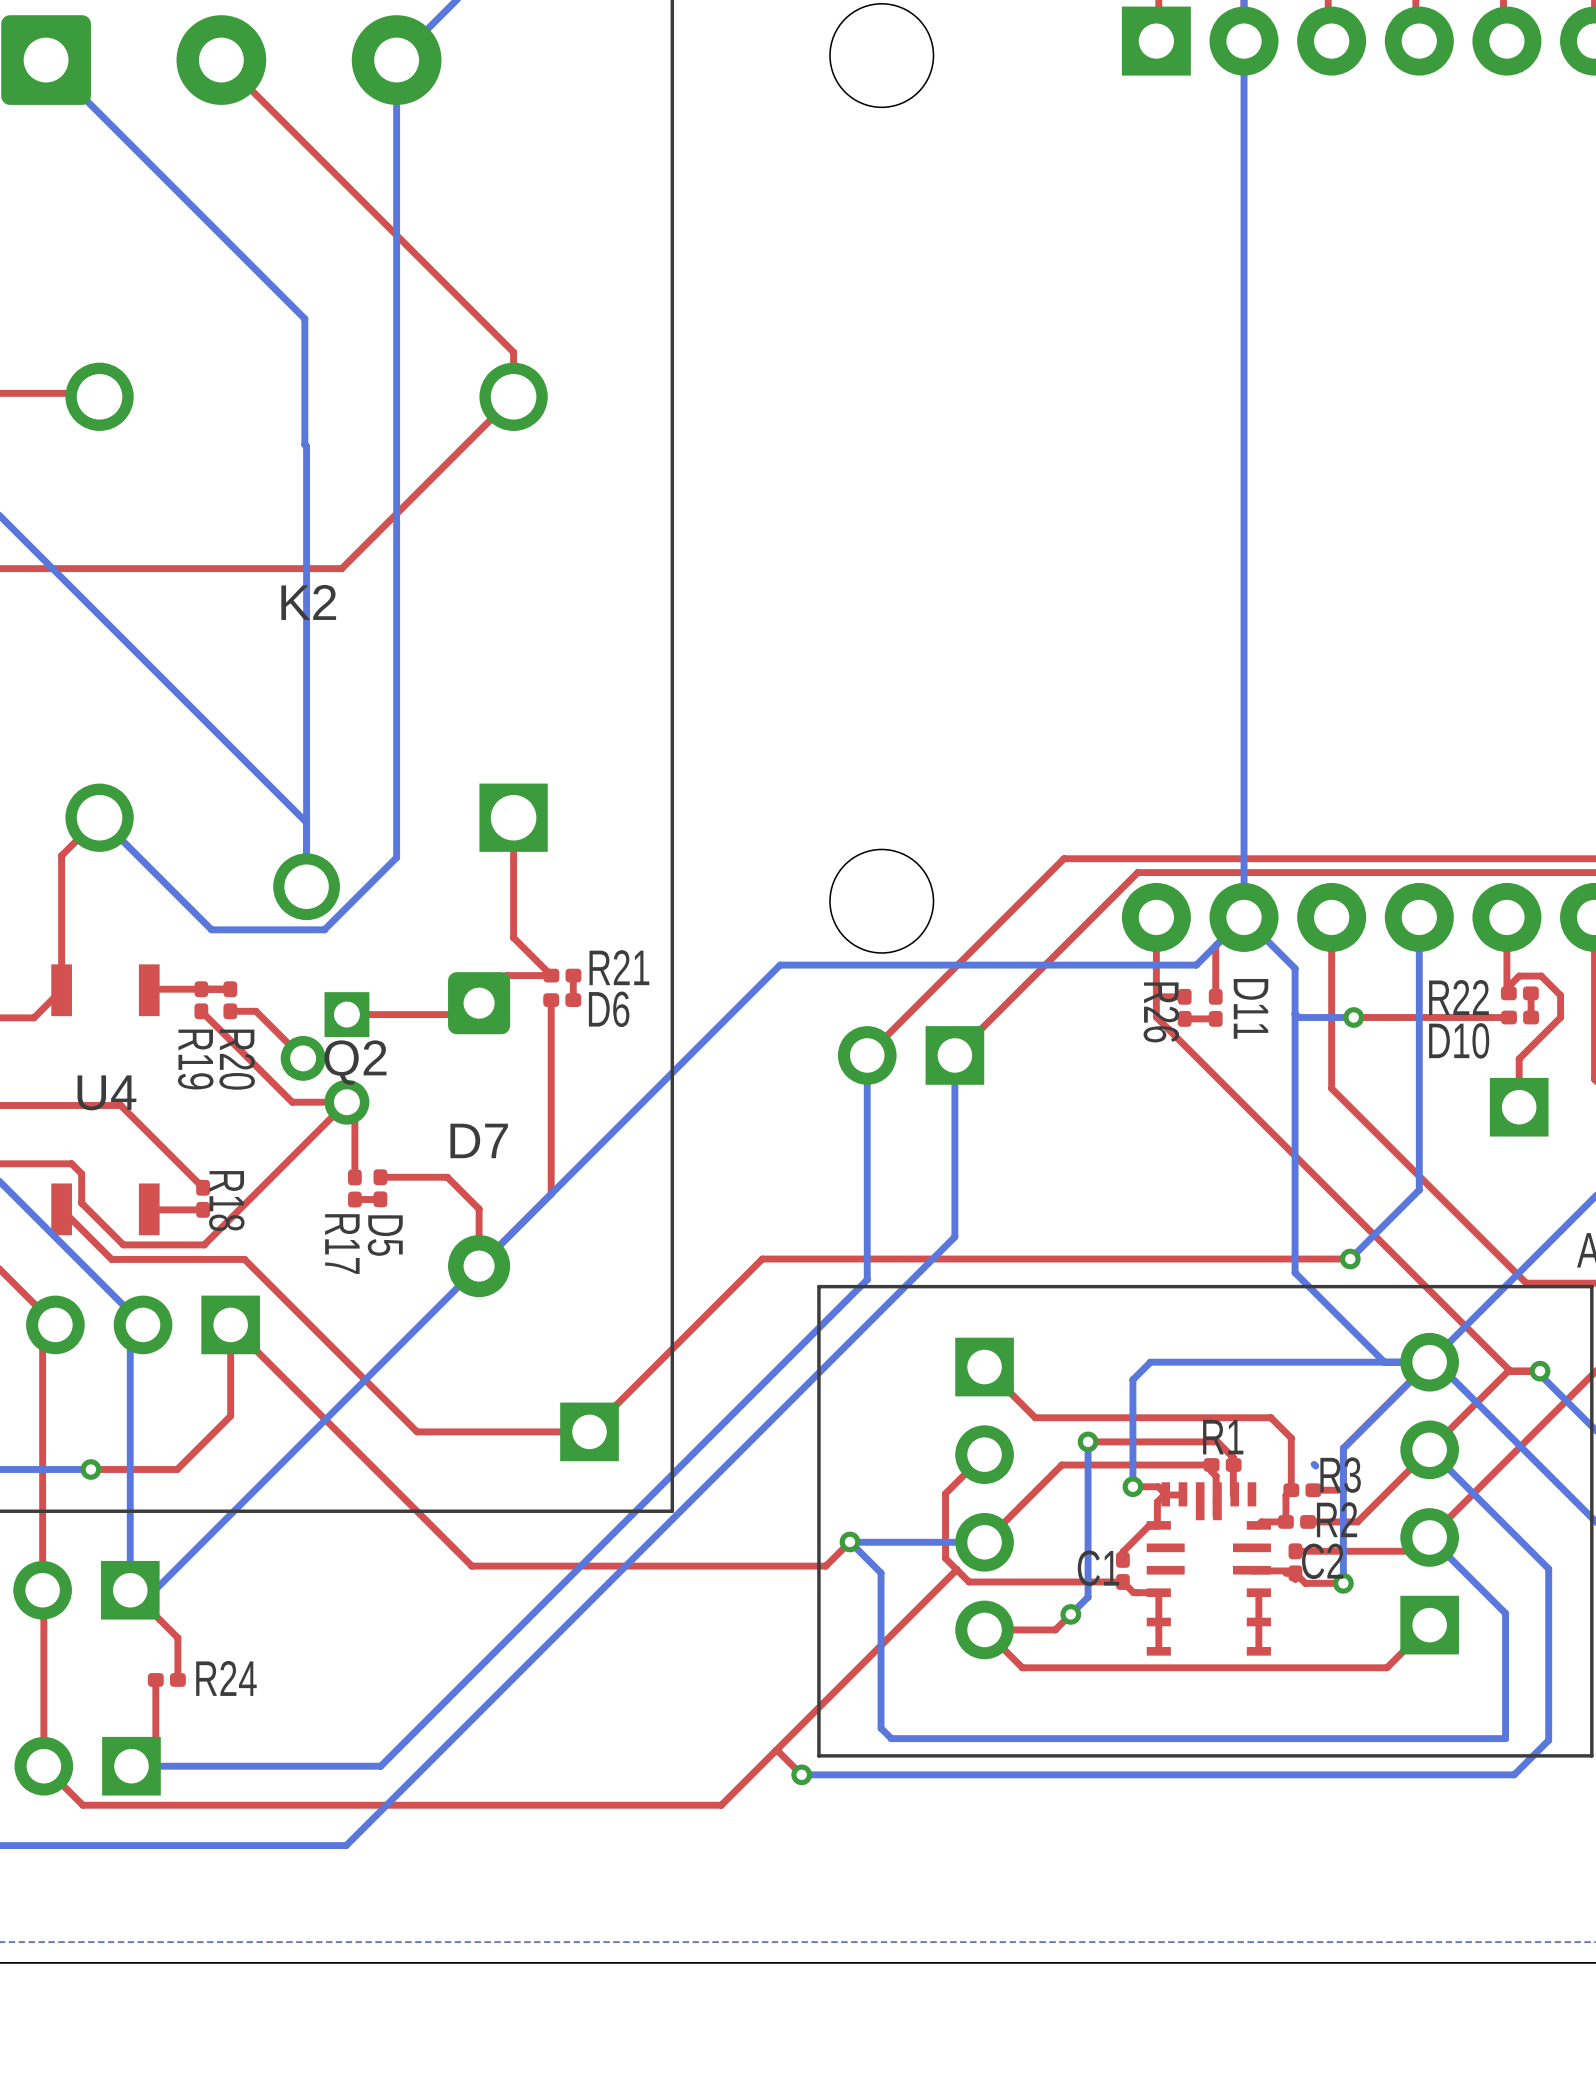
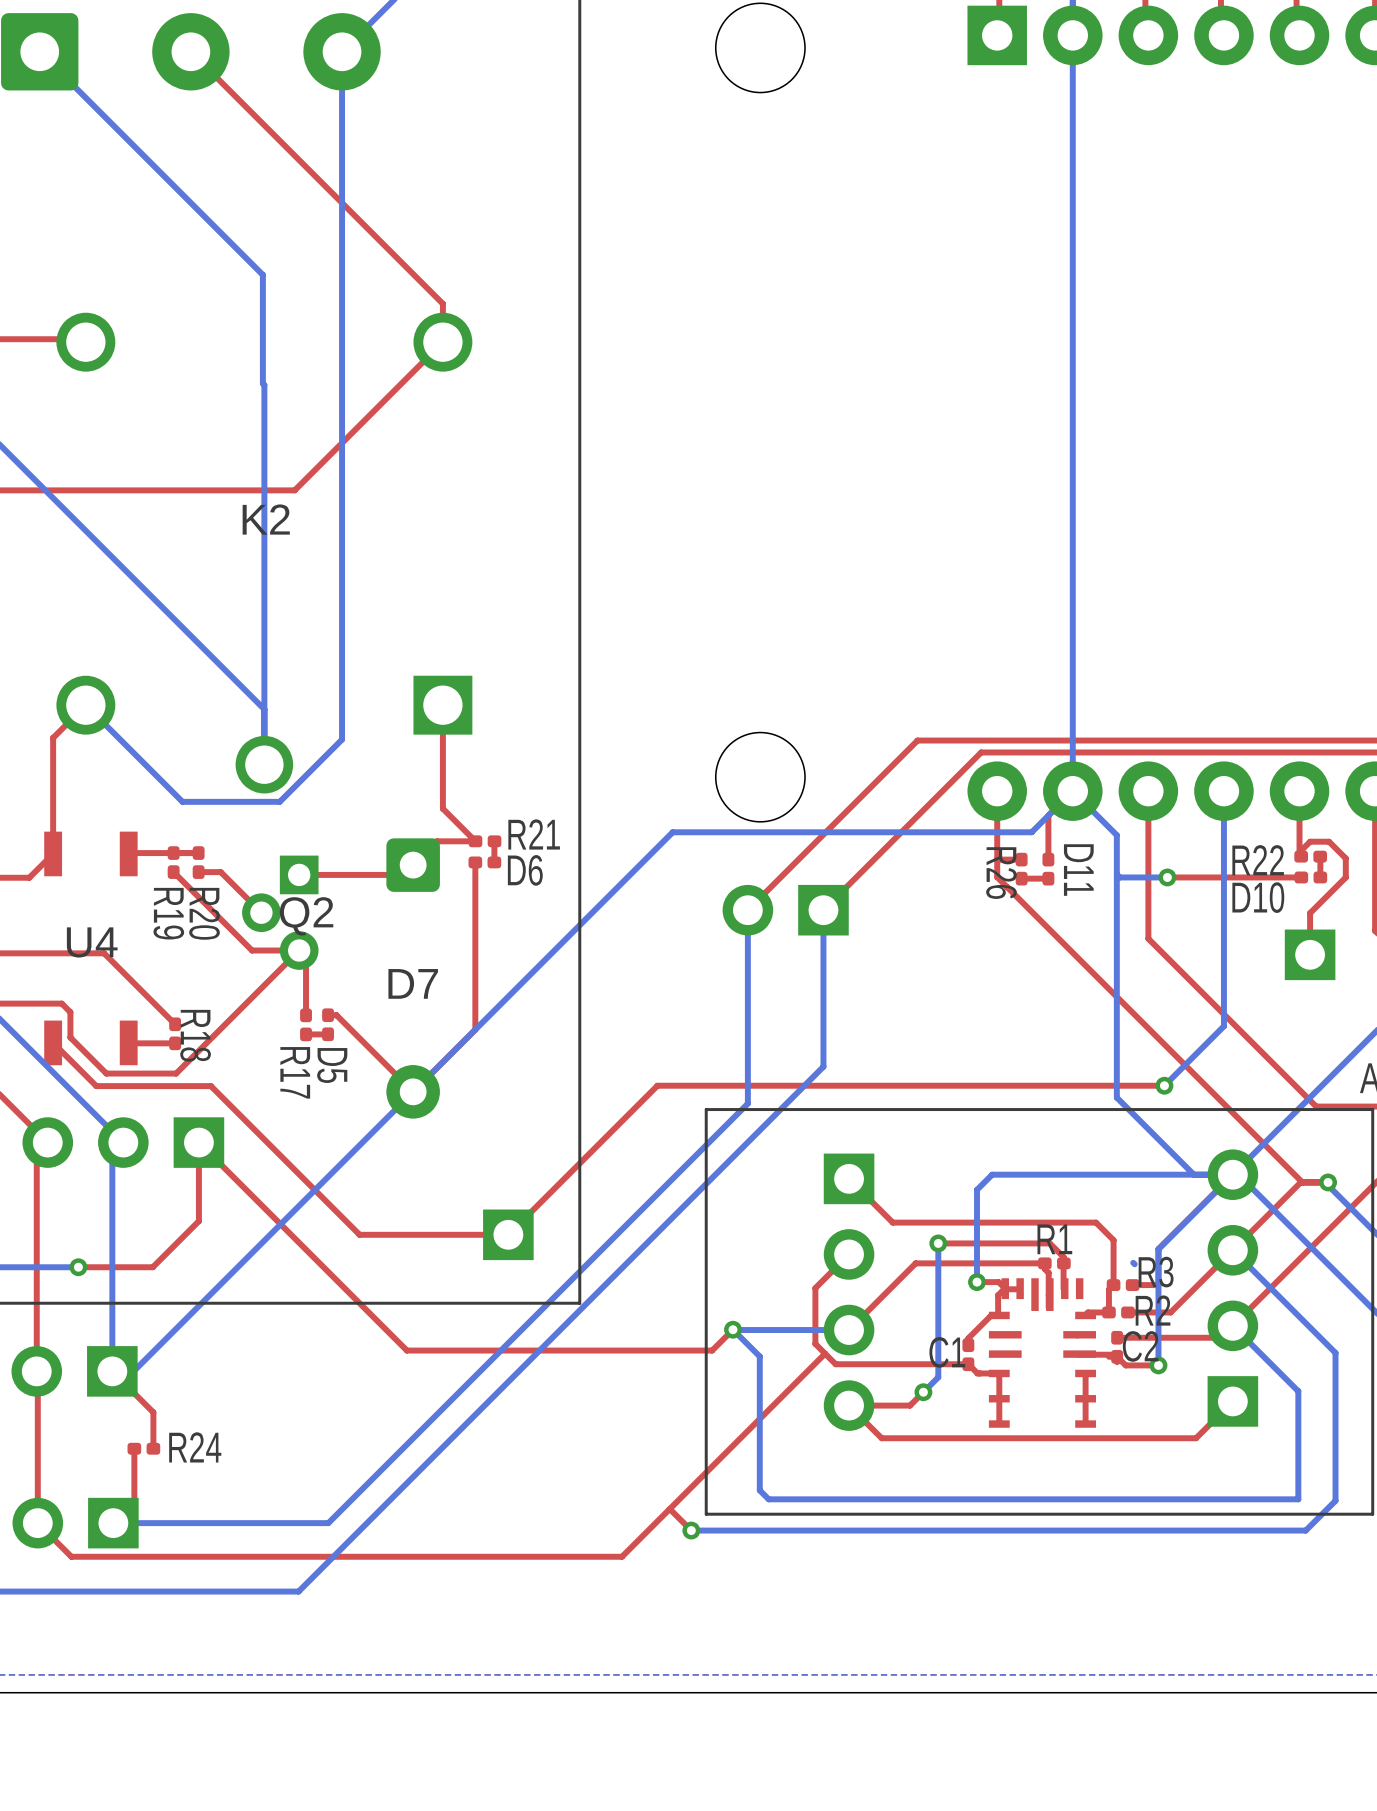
top track: (390, 1177) (447, 1177) (479, 1209) (479, 1266) -> (336, 1015) (413, 1091)

